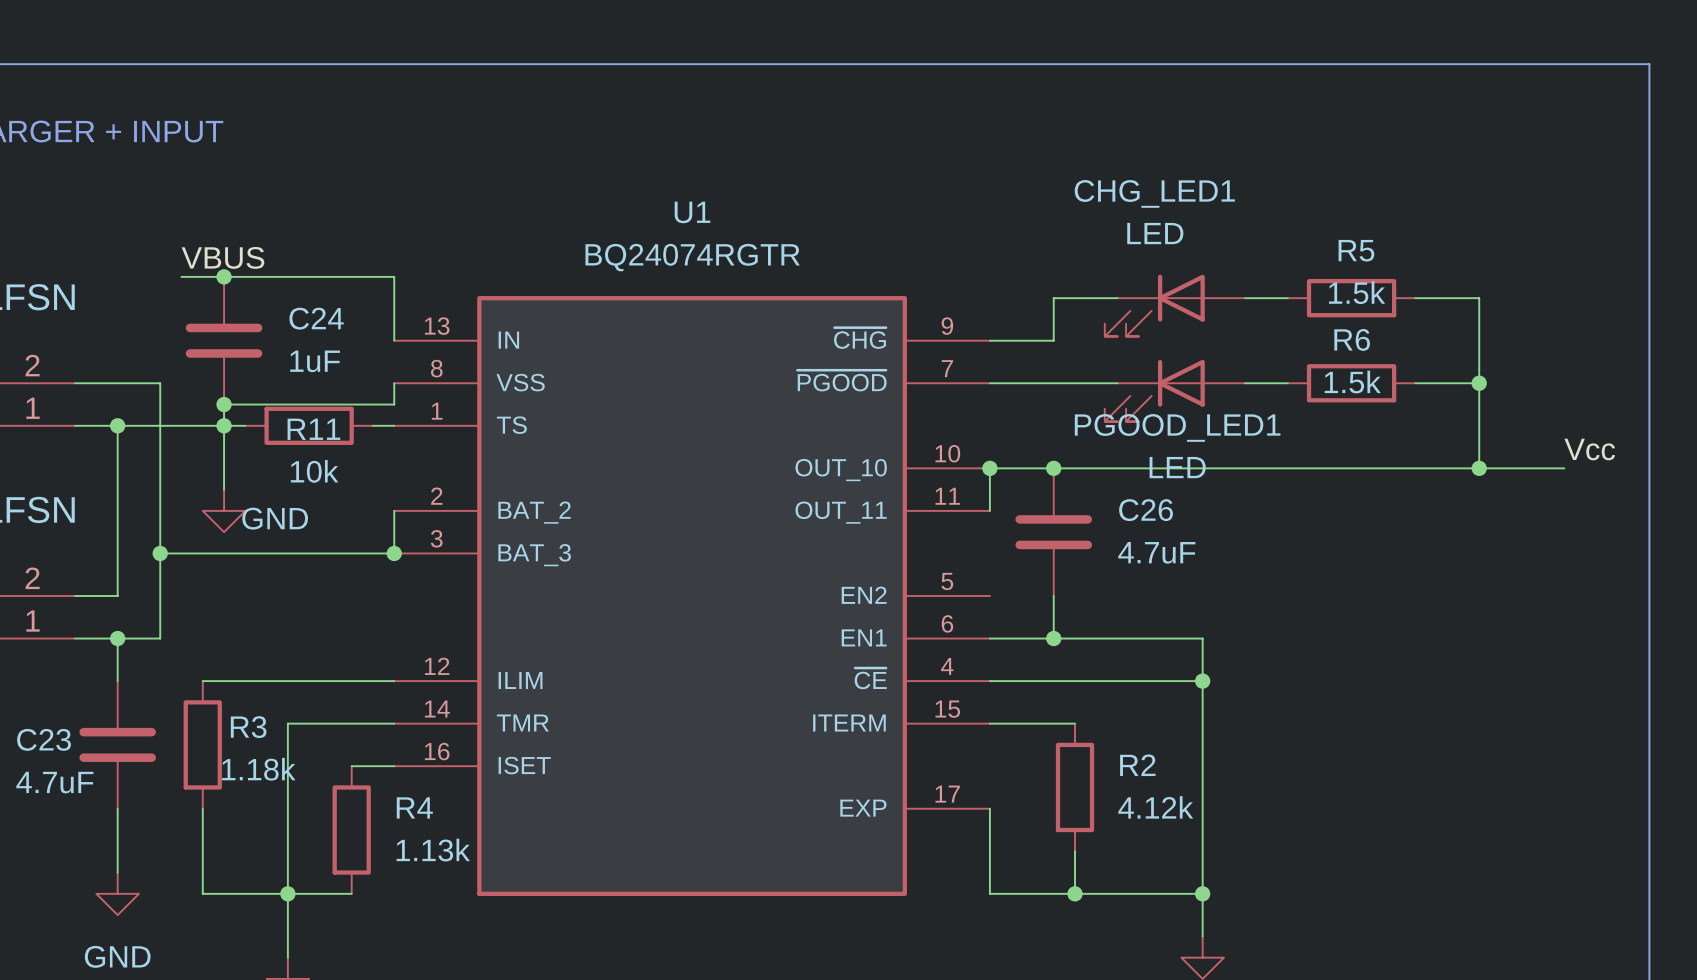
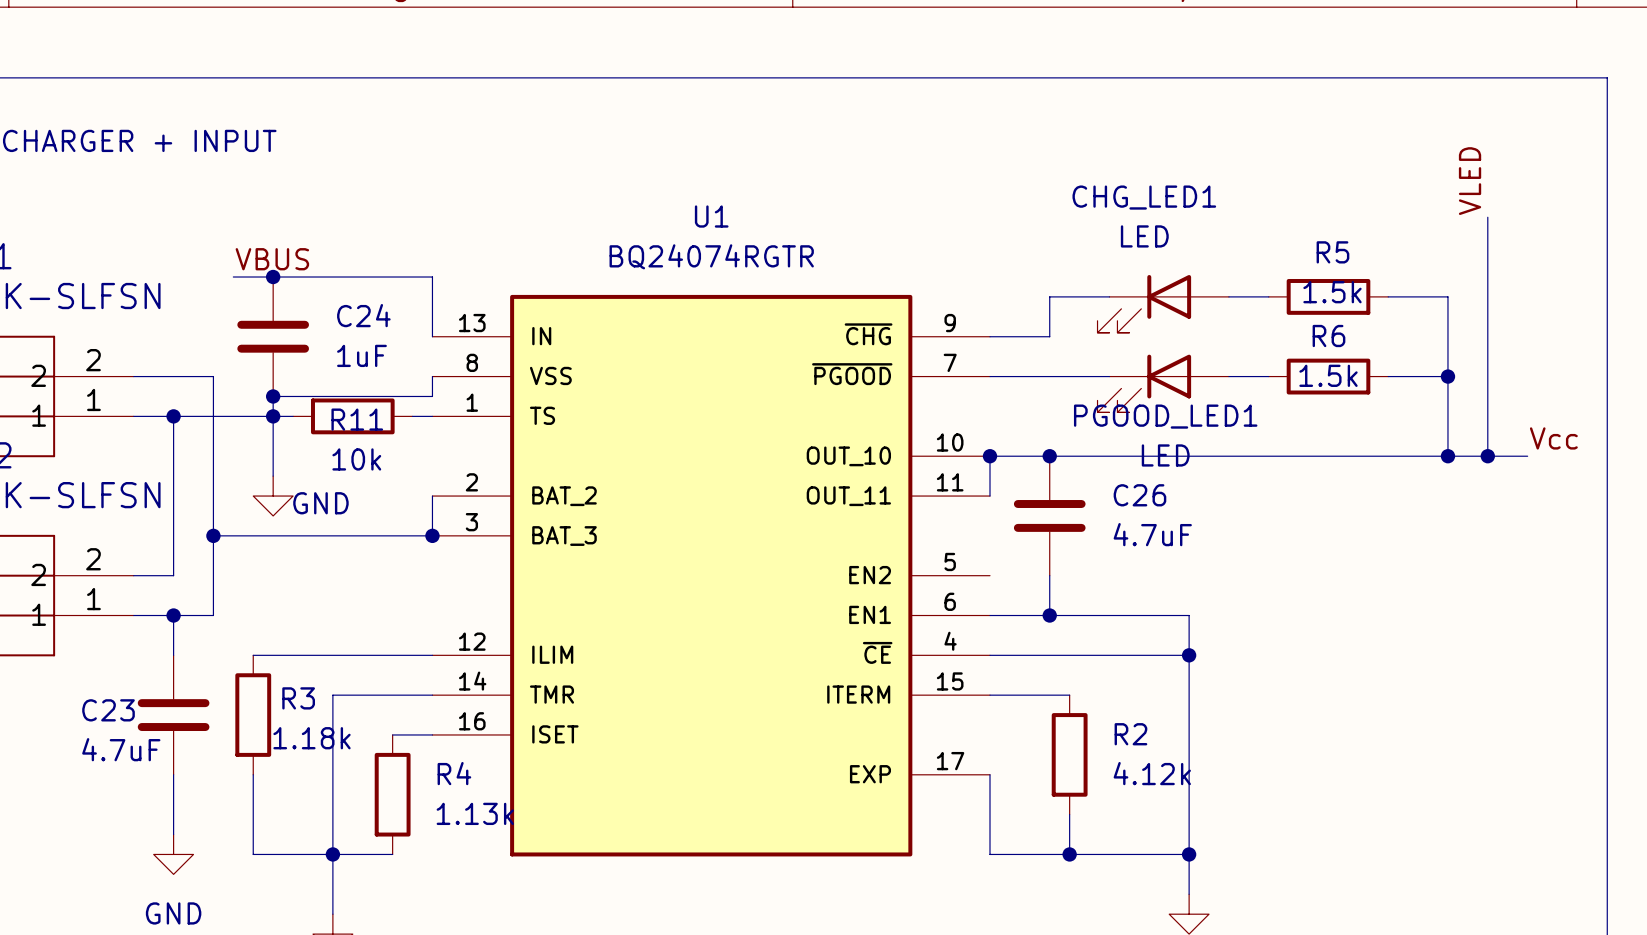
label: none -> VLED (1470, 181)
wire: none -> (1487, 217) (1487, 456)
junction: none -> (1487, 456)

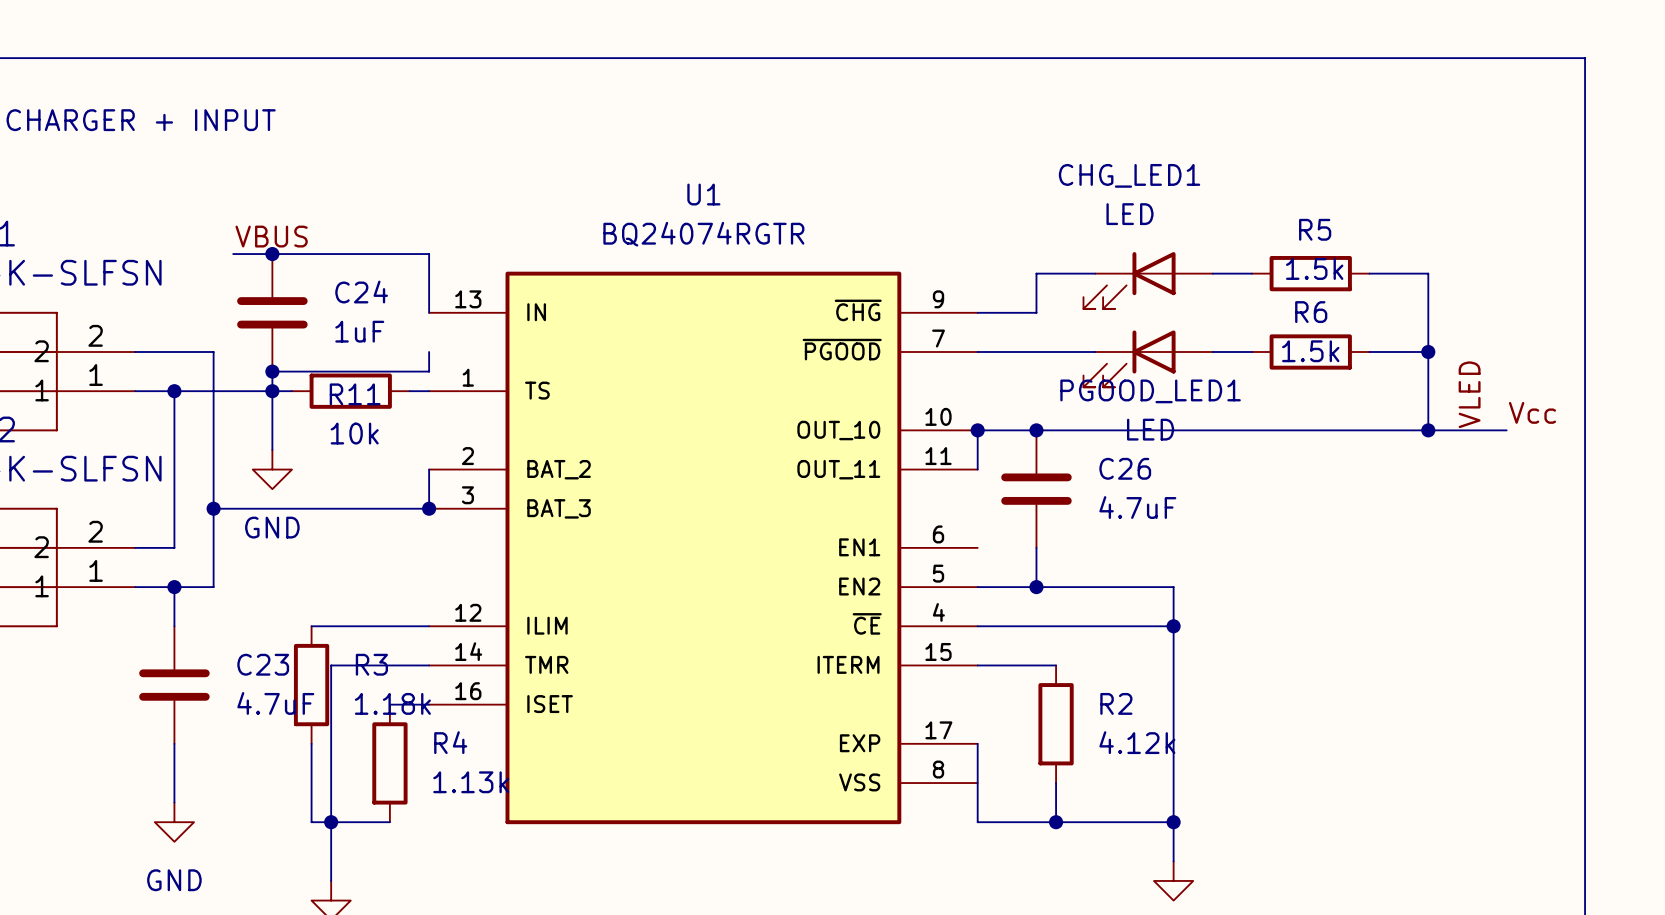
label position: VLED (1470, 181) -> VLED (1469, 394)
wire: (1487, 217) (1487, 456) -> none
U1 symbol: [432, 294, 991, 857] -> [429, 271, 978, 825]
junction: (1487, 456) -> none
power symbol text position: GND (320, 503) -> GND (272, 527)
wire: (253, 655) (312, 655) -> none
R3 name position: R3 (298, 698) -> R3 (371, 664)
C23 name position: C23 (108, 710) -> C23 (263, 664)
R3 position: (253, 715) -> (311, 685)
R3 value position: 1.18k (312, 738) -> 1.18k (392, 703)
C23 value position: 4.7uF (121, 749) -> 4.7uF (275, 703)
wire: (253, 774) (253, 854) (312, 854) -> (311, 743) (311, 822)

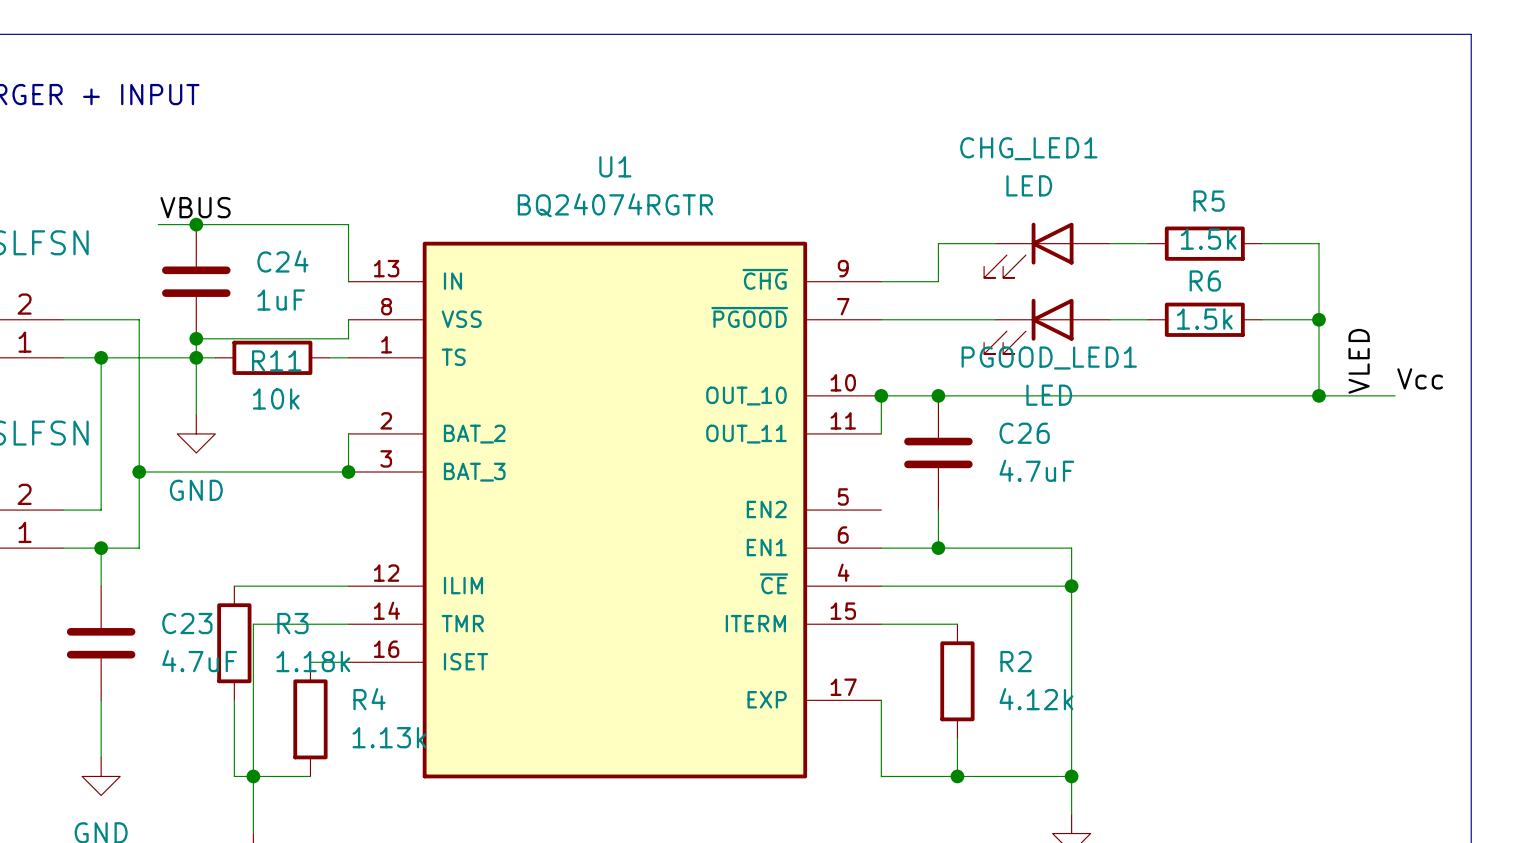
U1 symbol: [429, 271, 978, 825] -> [348, 241, 882, 779]

